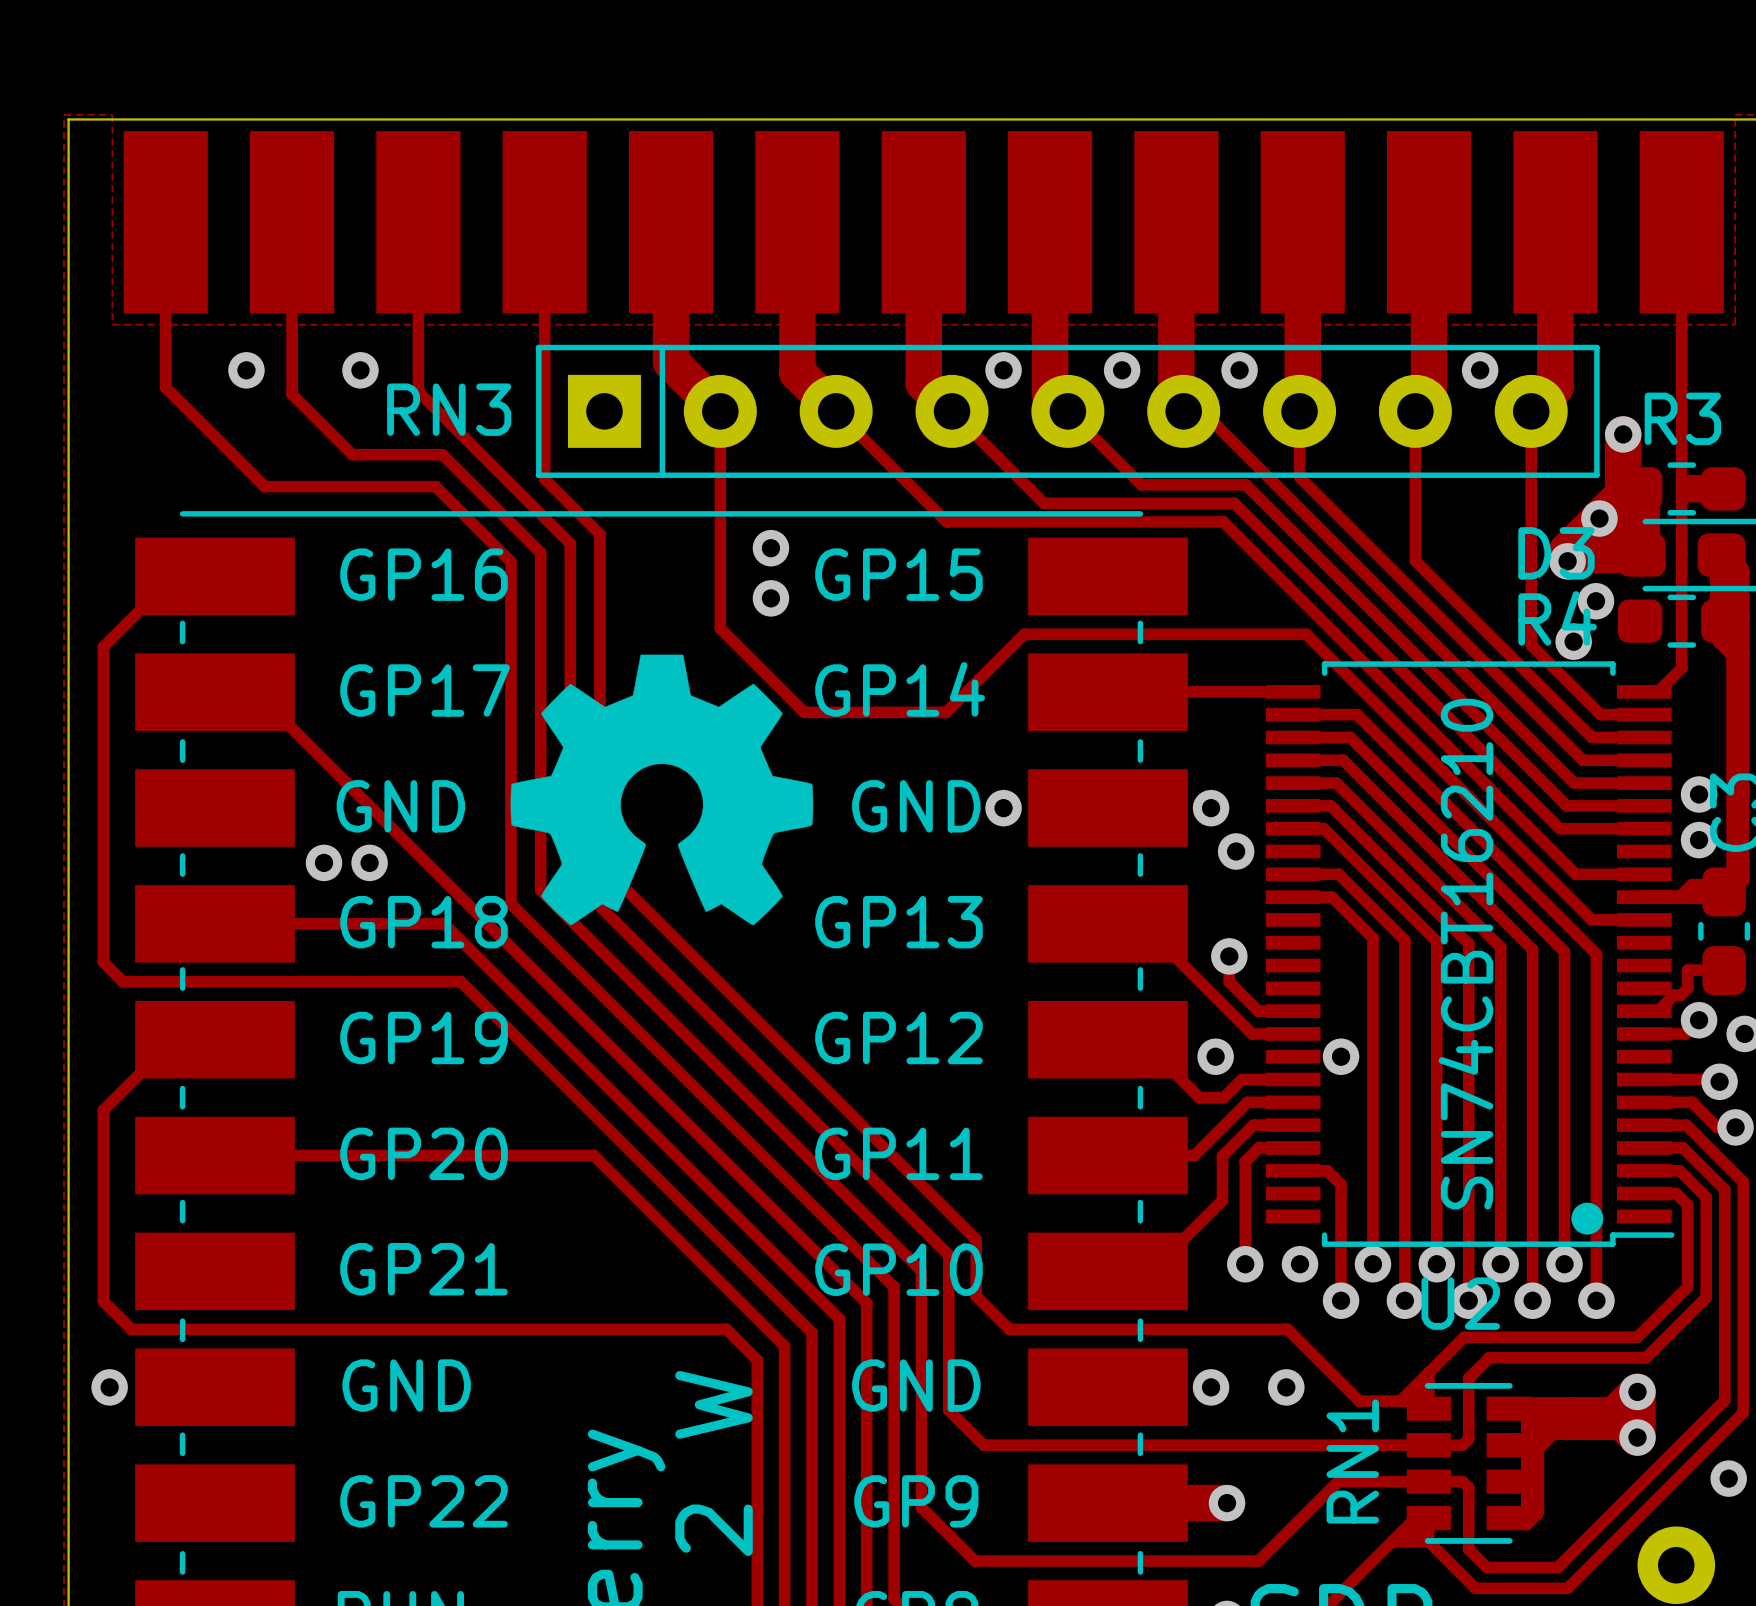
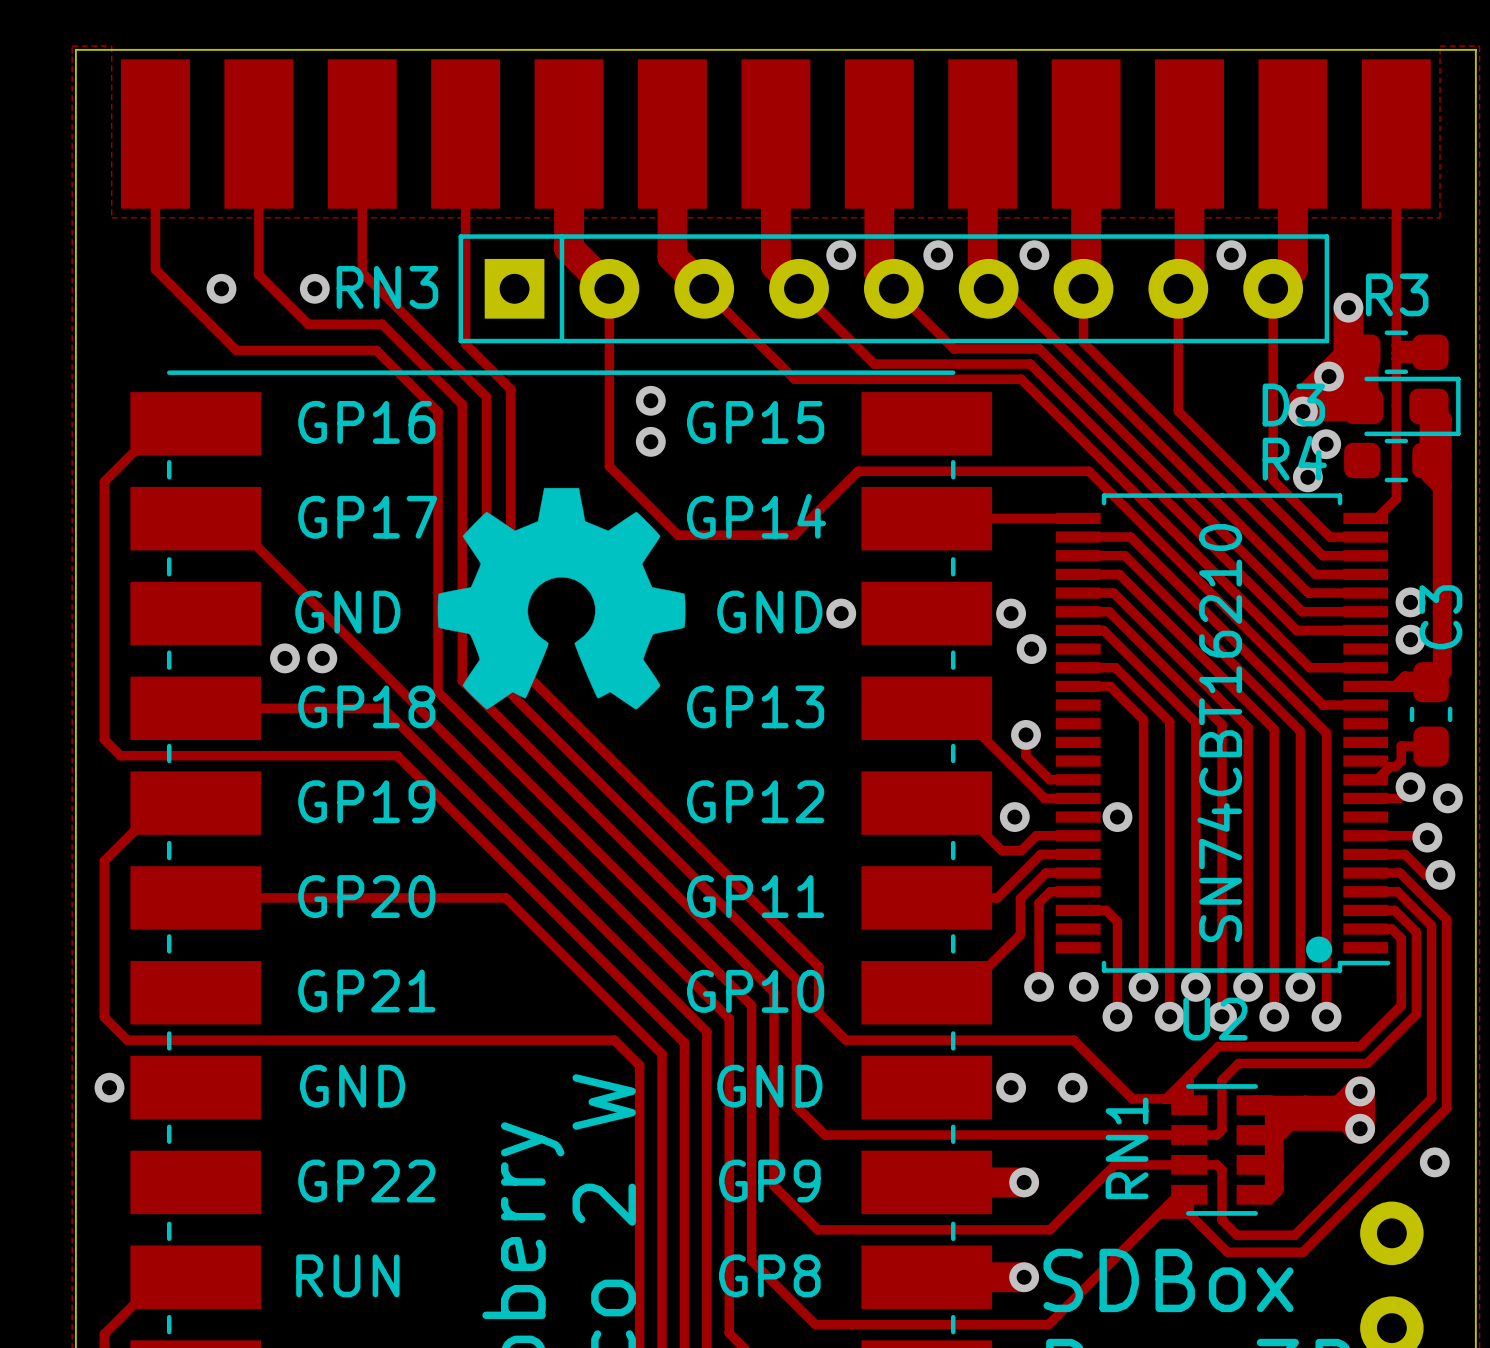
via position: (246, 370) -> (221, 288)
via position: (360, 370) -> (314, 288)

